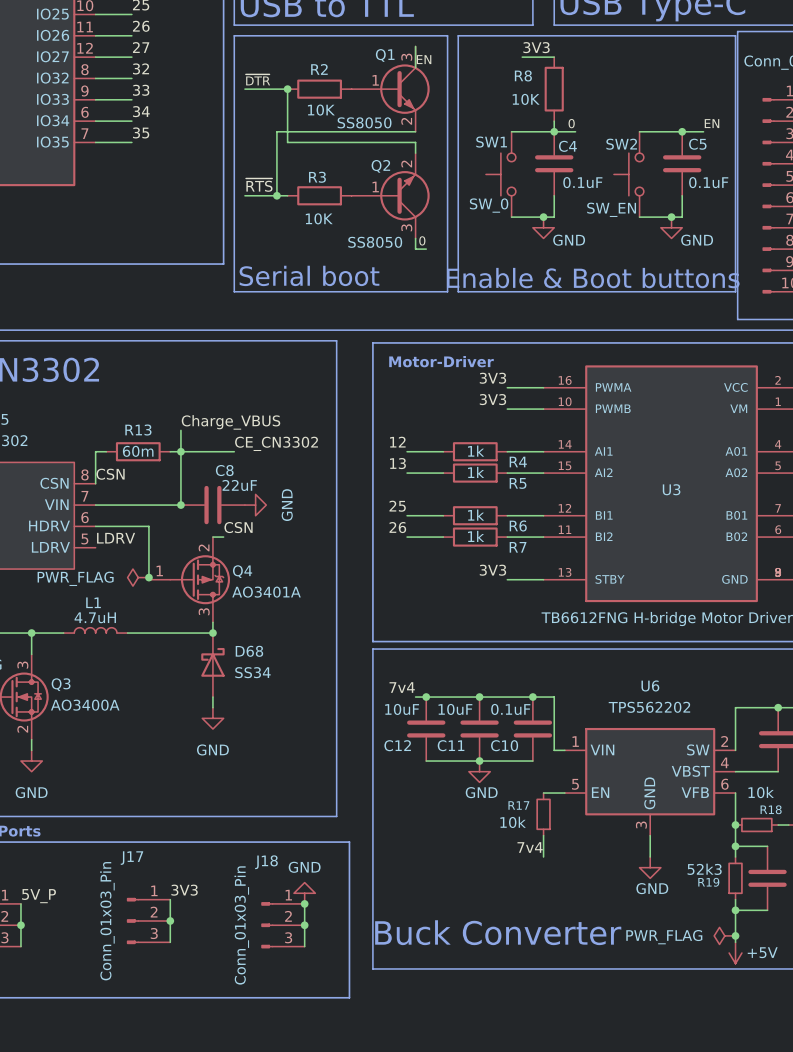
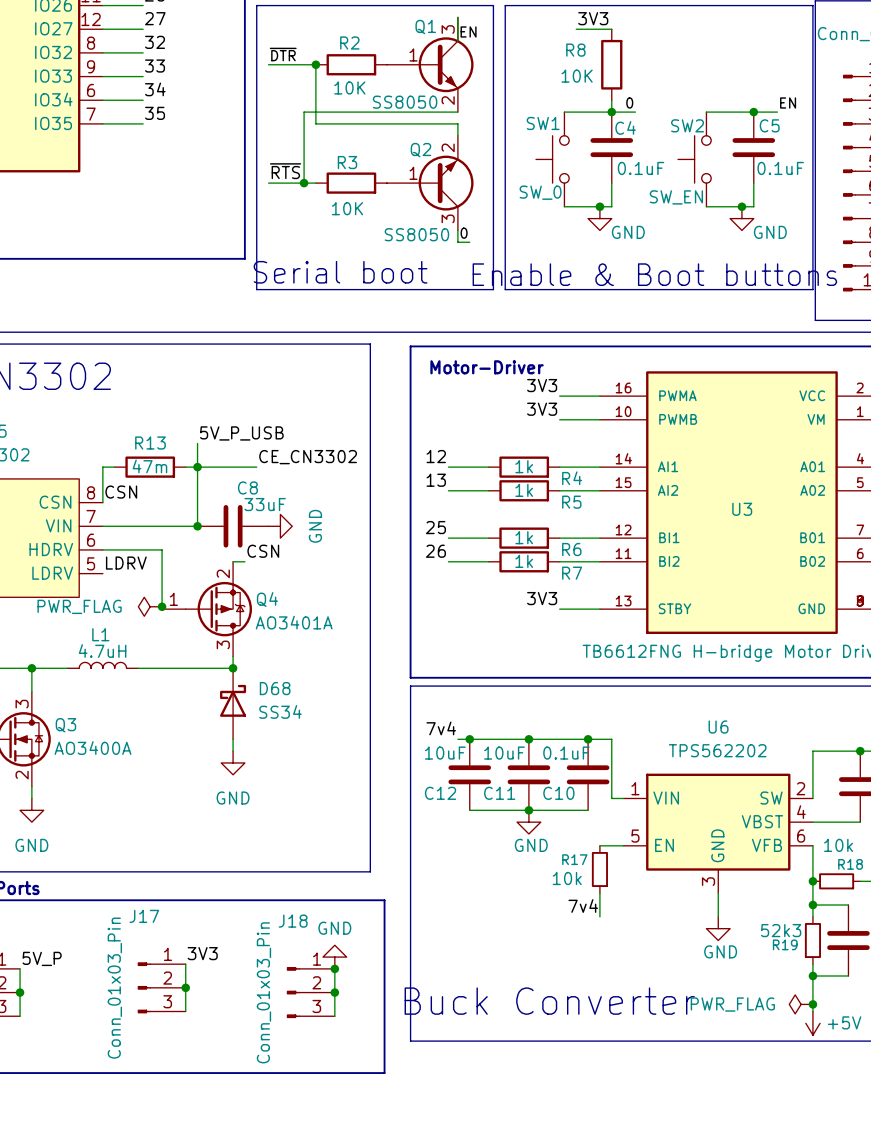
label: Charge_VBUS (231, 422) -> 5V_P_USB (241, 433)
R13 value: 60m (138, 451) -> 47m (149, 466)
C8 value: 22uF (239, 485) -> 33uF (265, 504)

